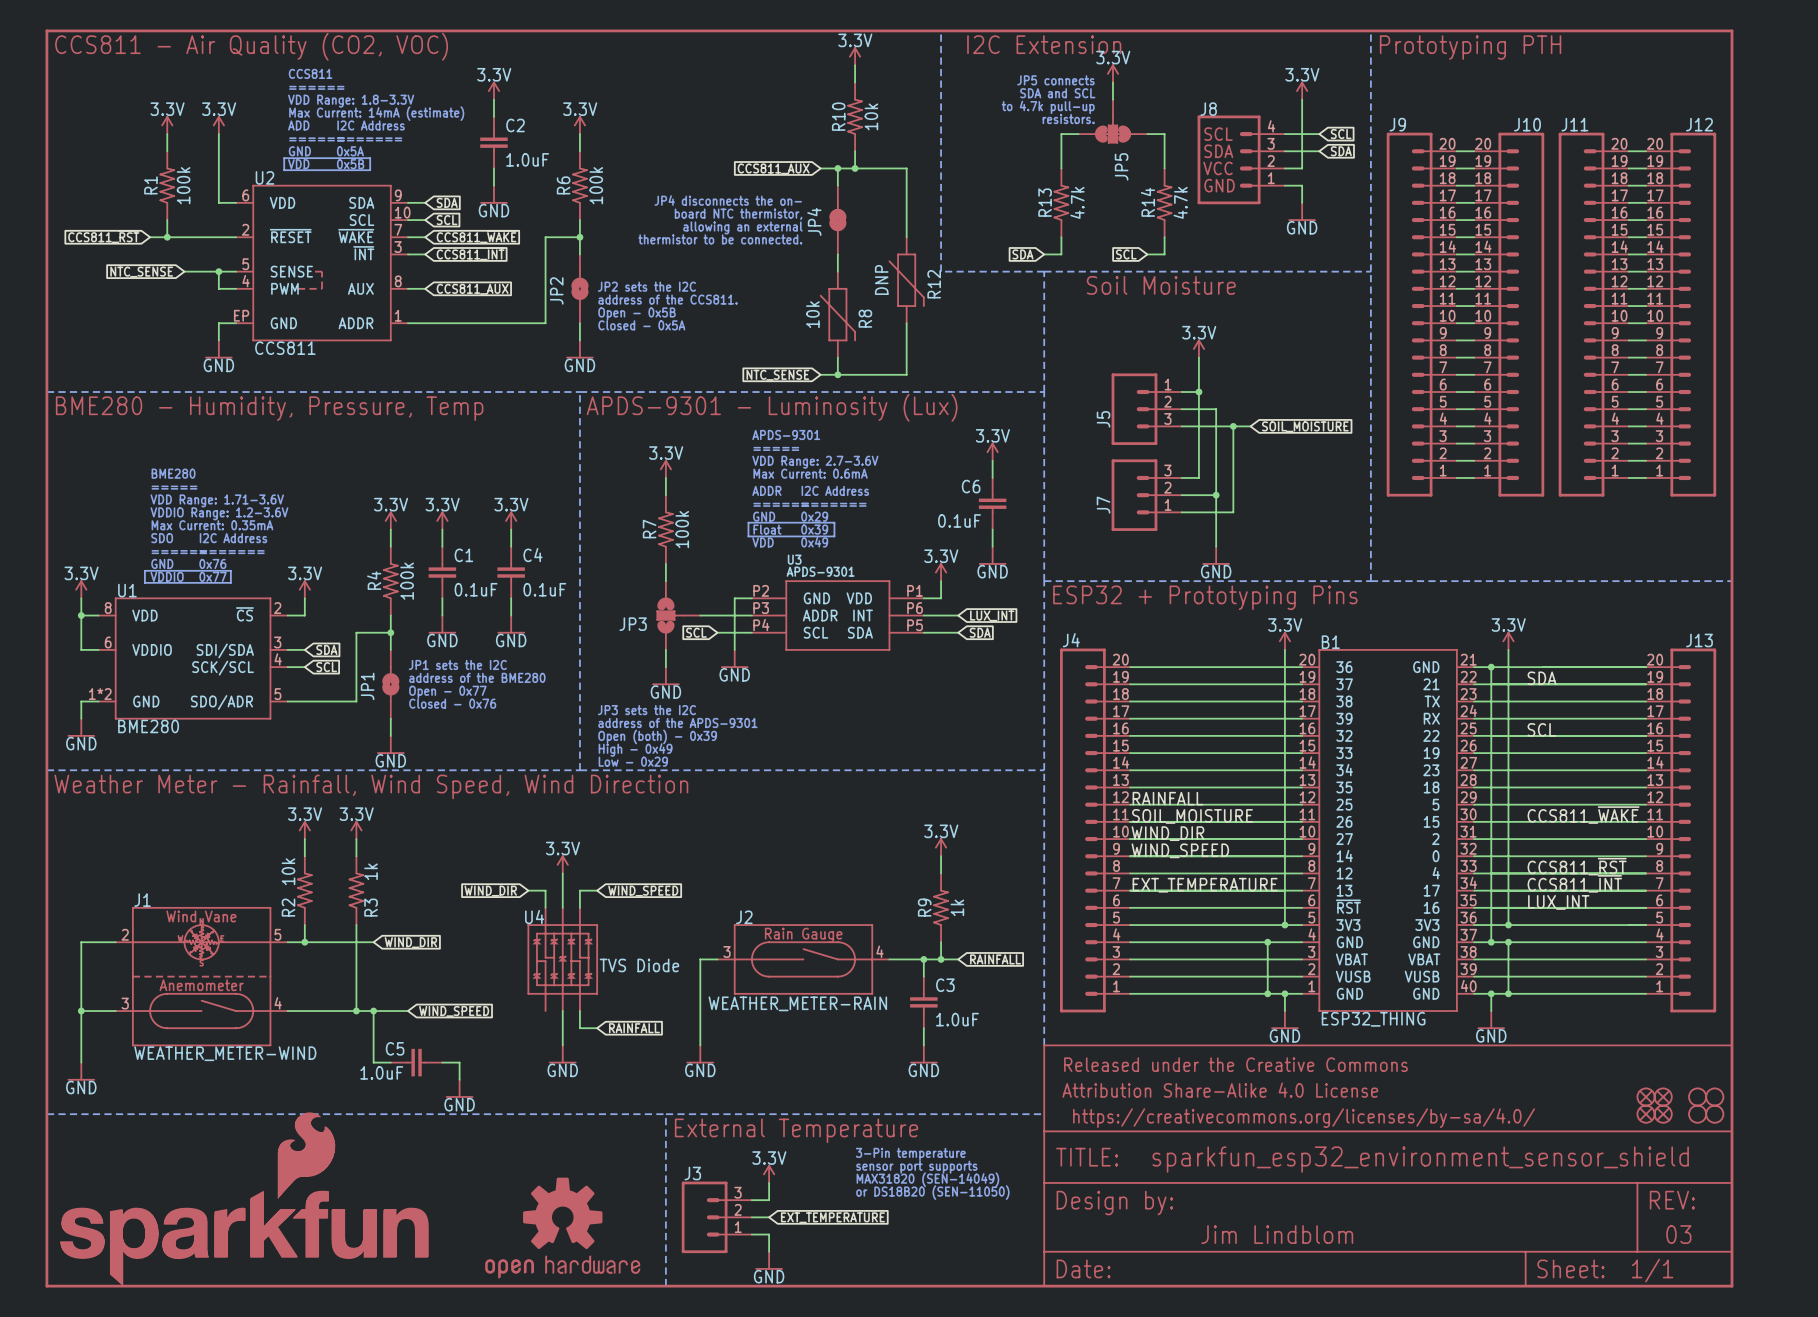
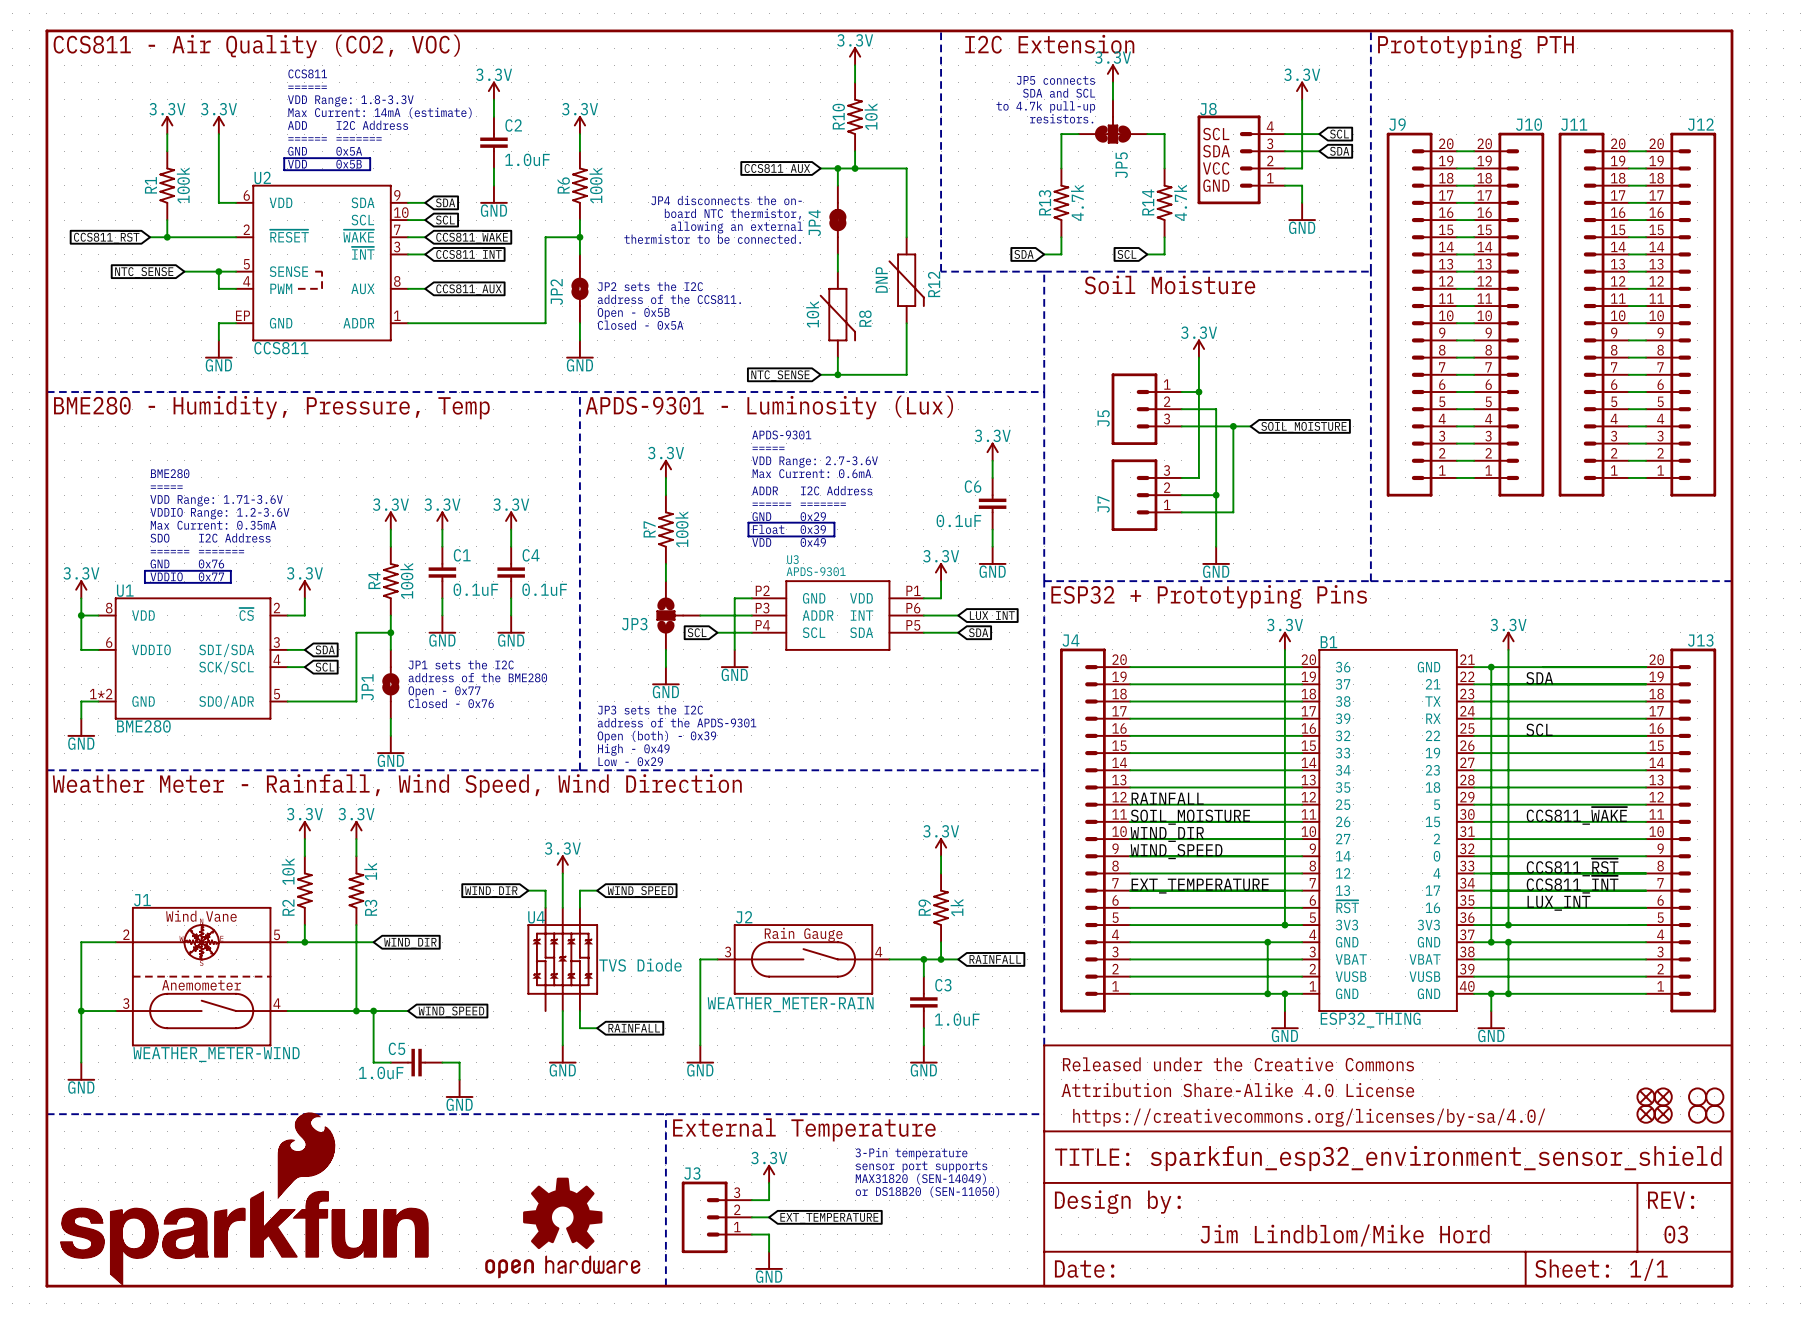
text: Jim Lindblom (1277, 1234) -> Jim Lindblom/Mike Hord (1345, 1235)

